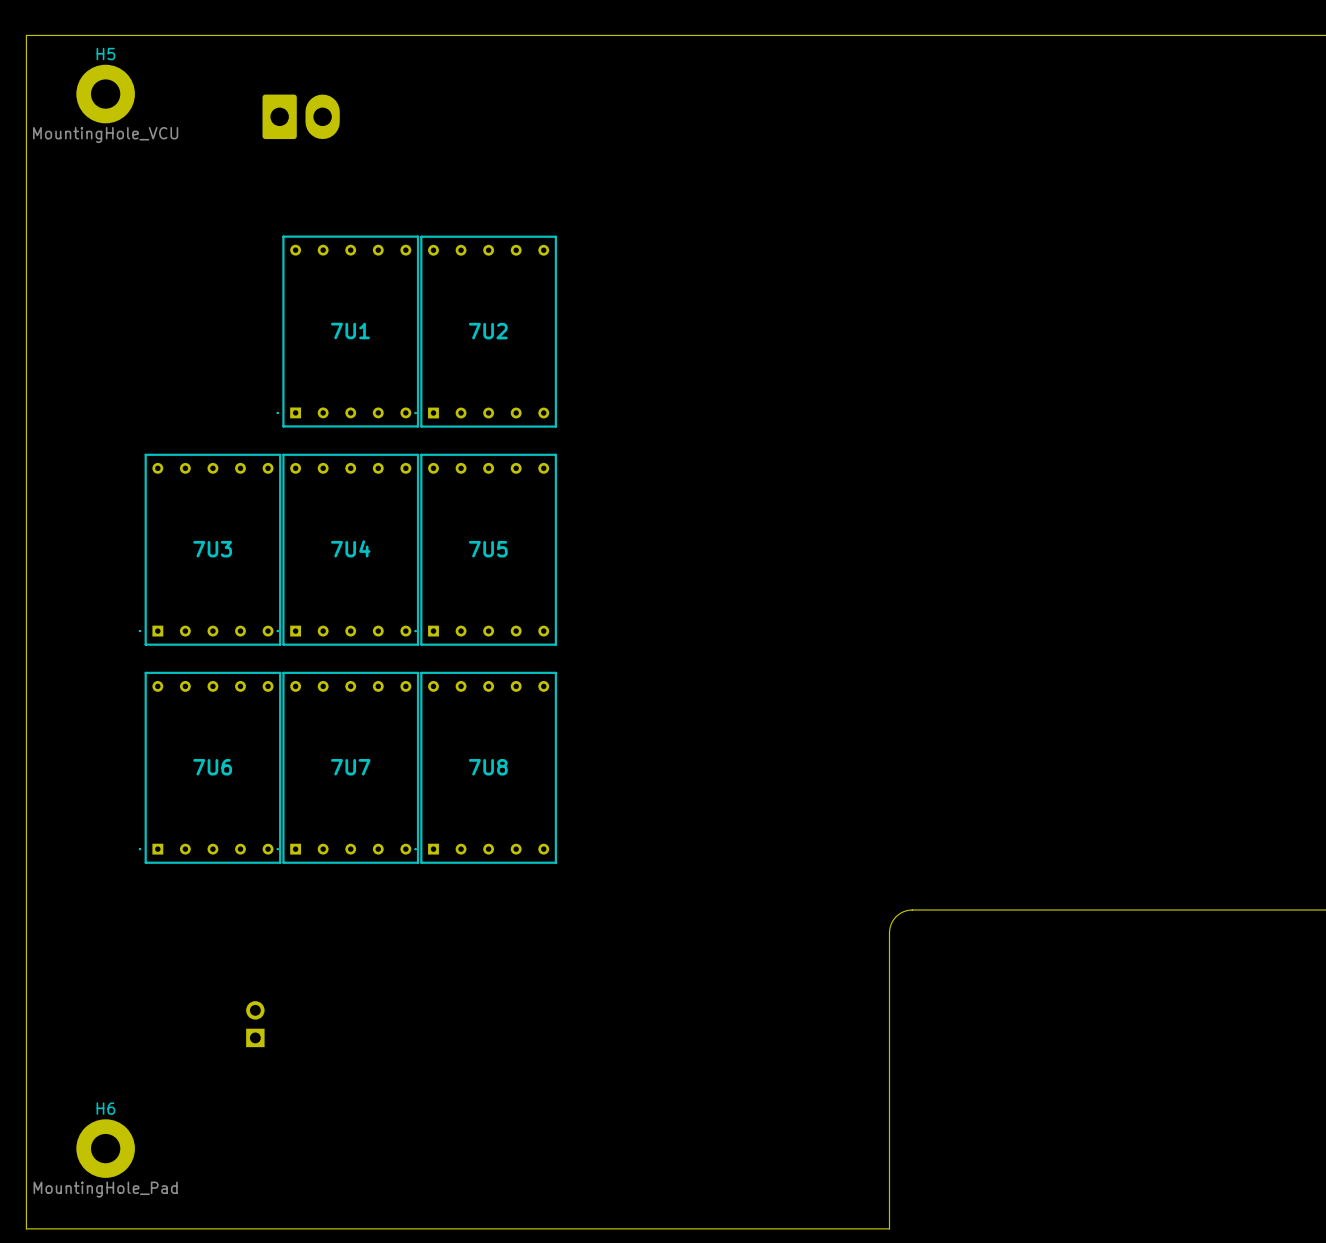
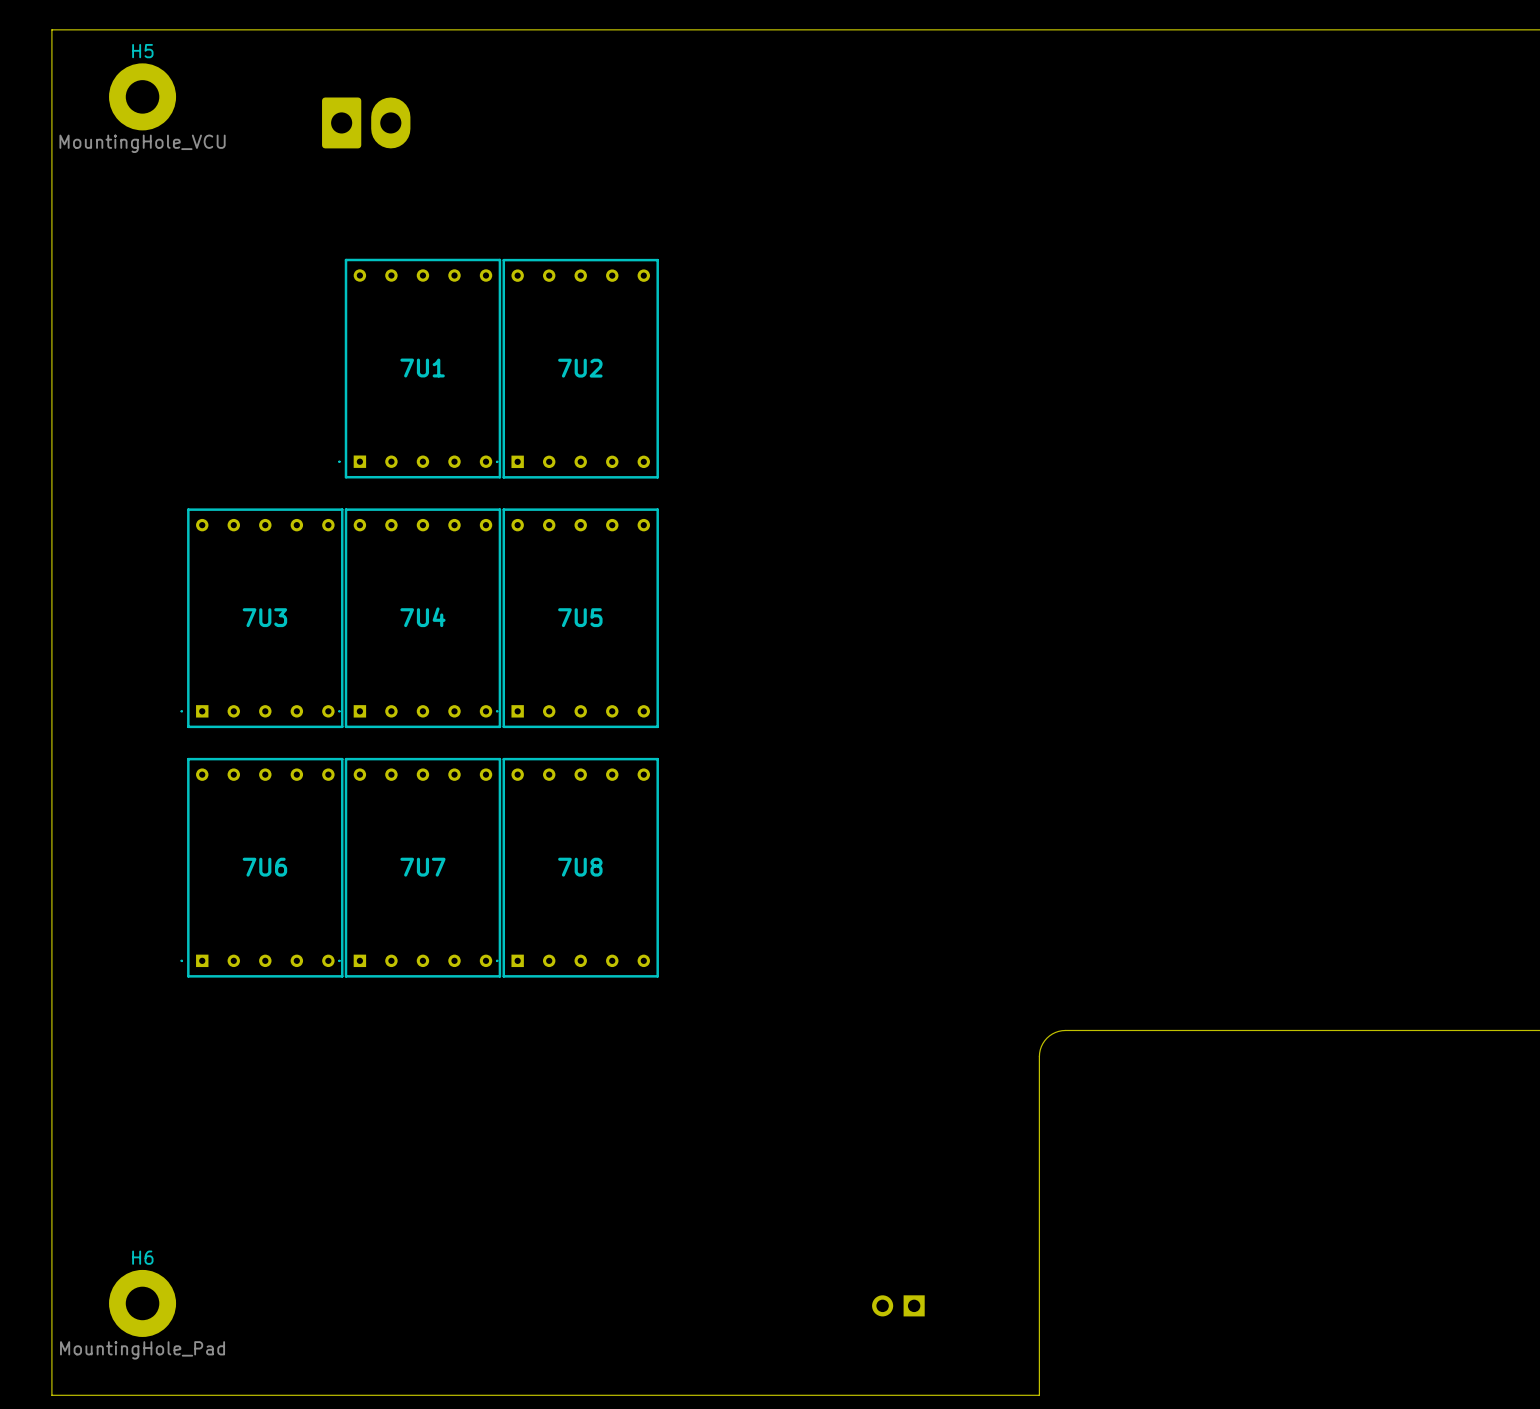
part: (255, 1024) -> none
part: none -> (898, 1305)

